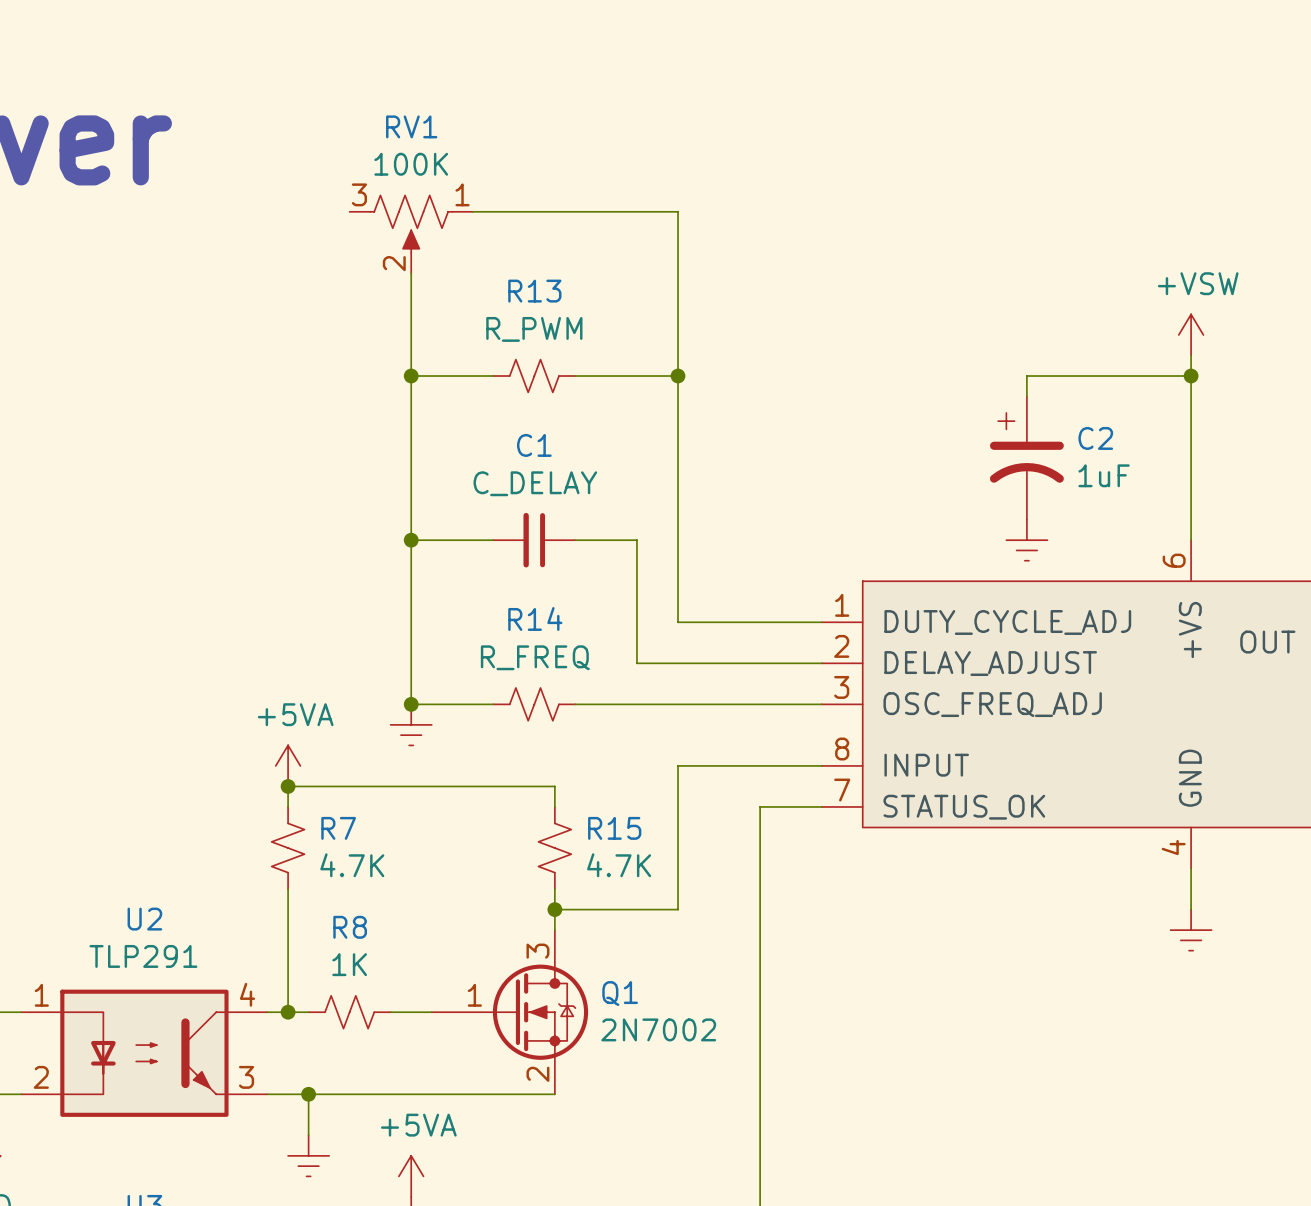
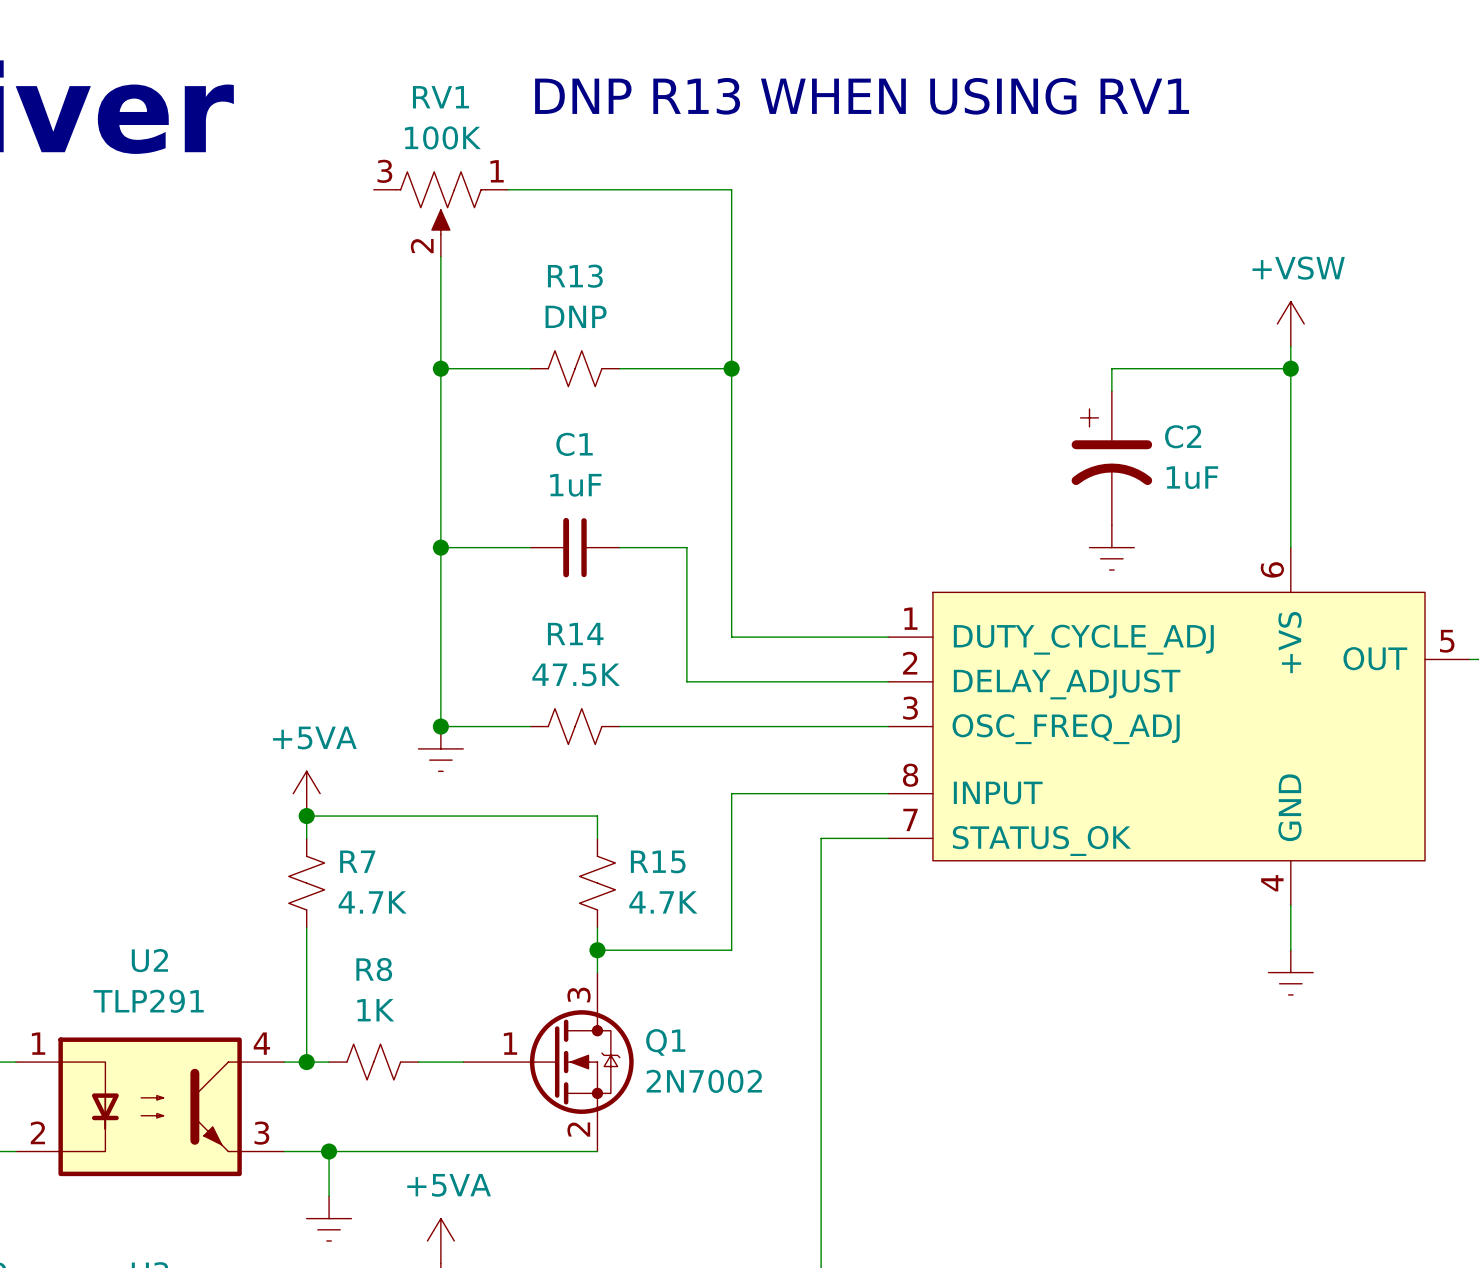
text: none -> DNP R13 WHEN USING RV1 (862, 96)
R13 value: R_PWM (534, 329) -> DNP (576, 316)
C1 value: C_DELAY (535, 483) -> 1uF (575, 485)
R14 value: R_FREQ (535, 657) -> 47.5K (576, 674)

